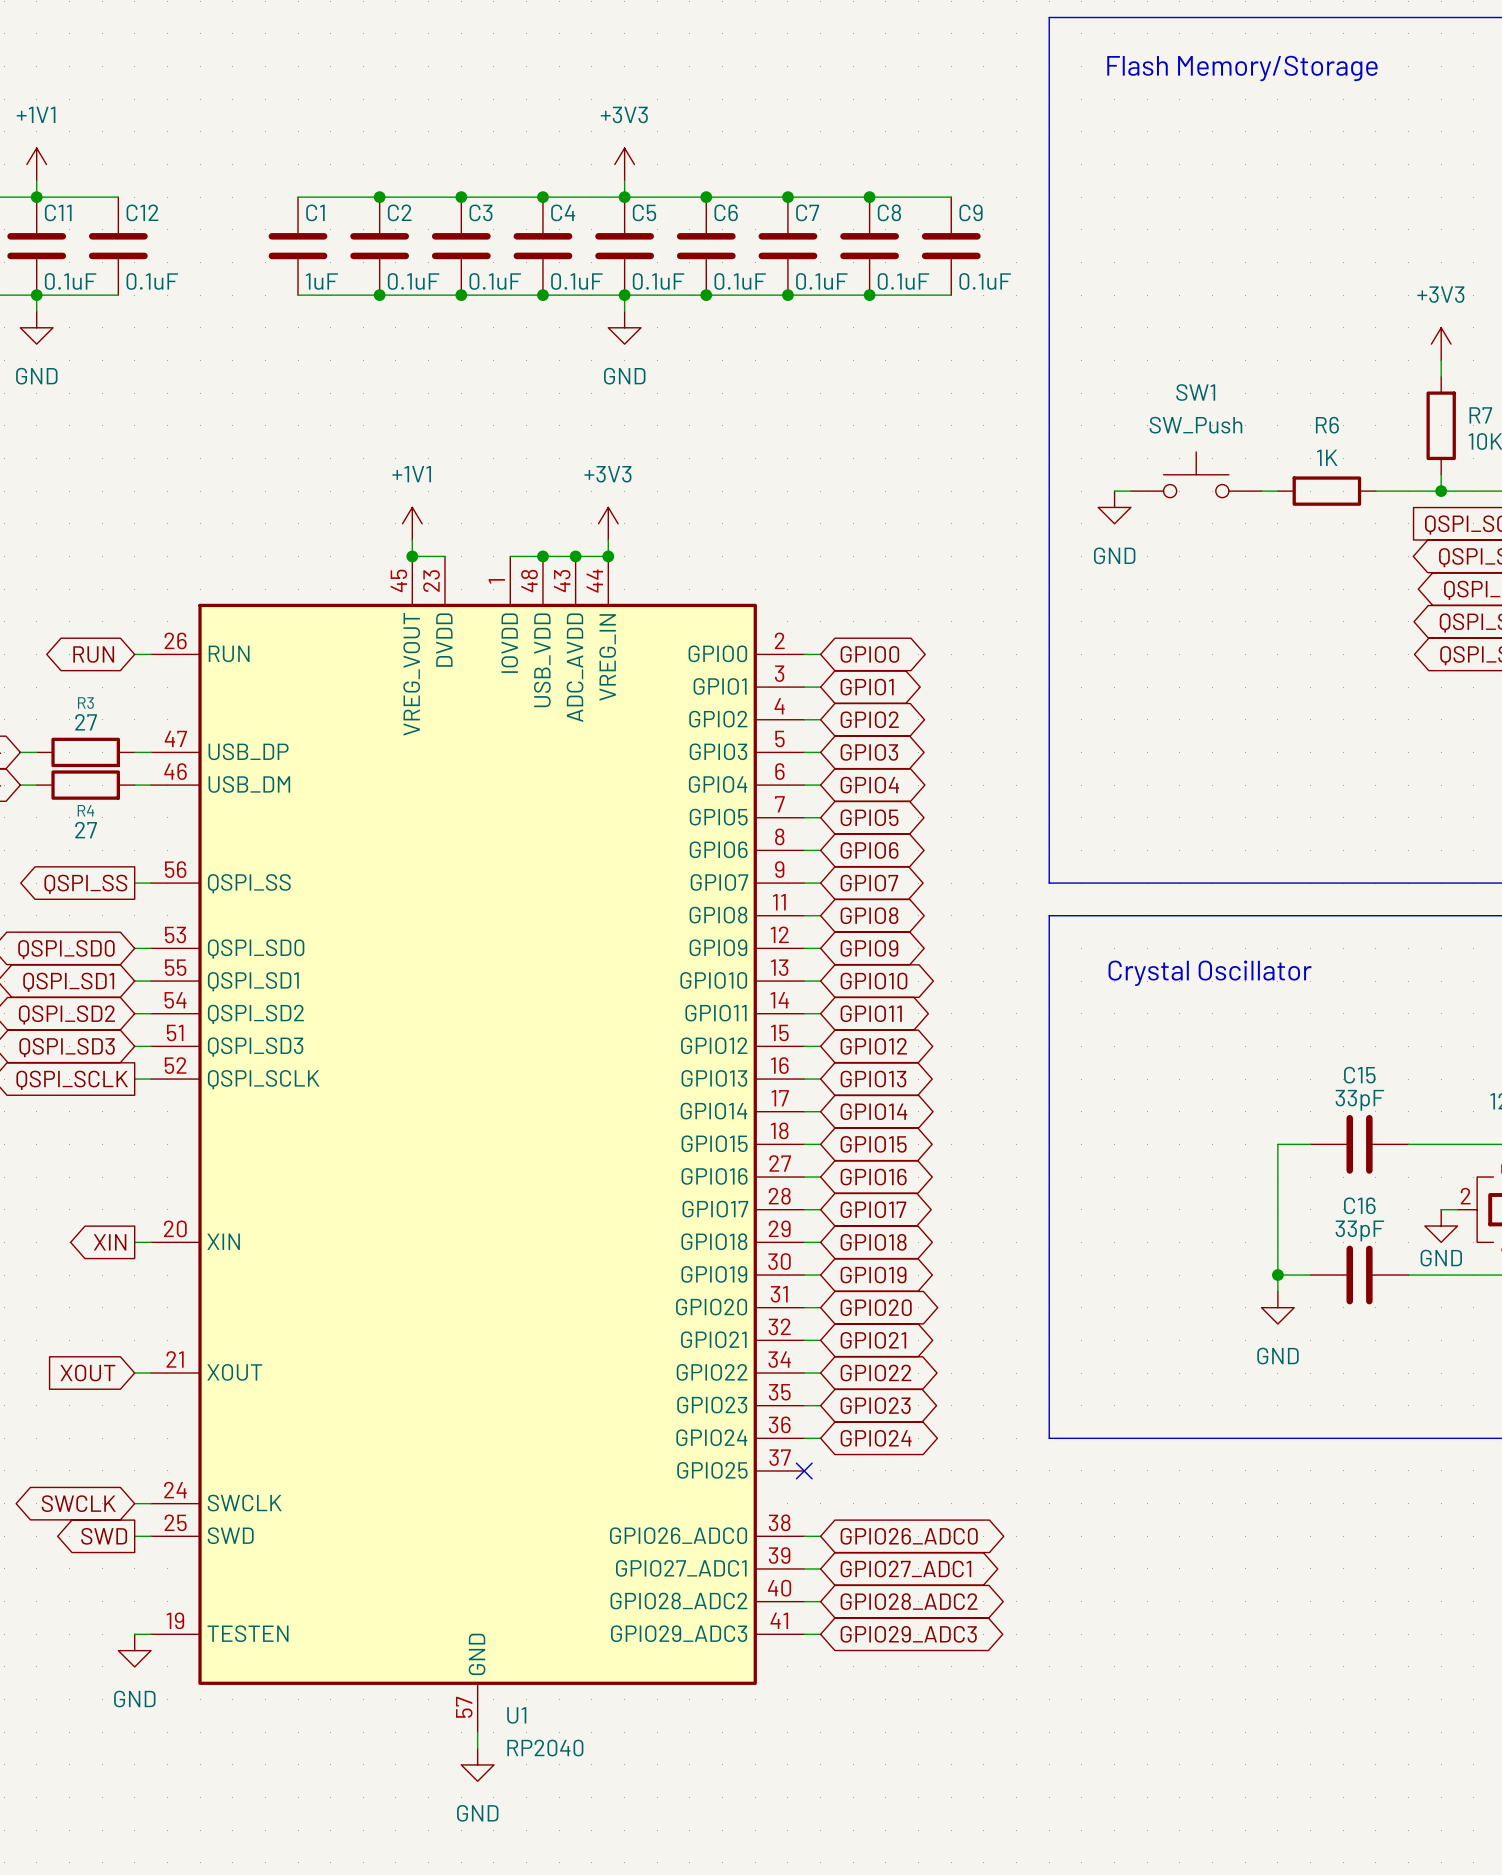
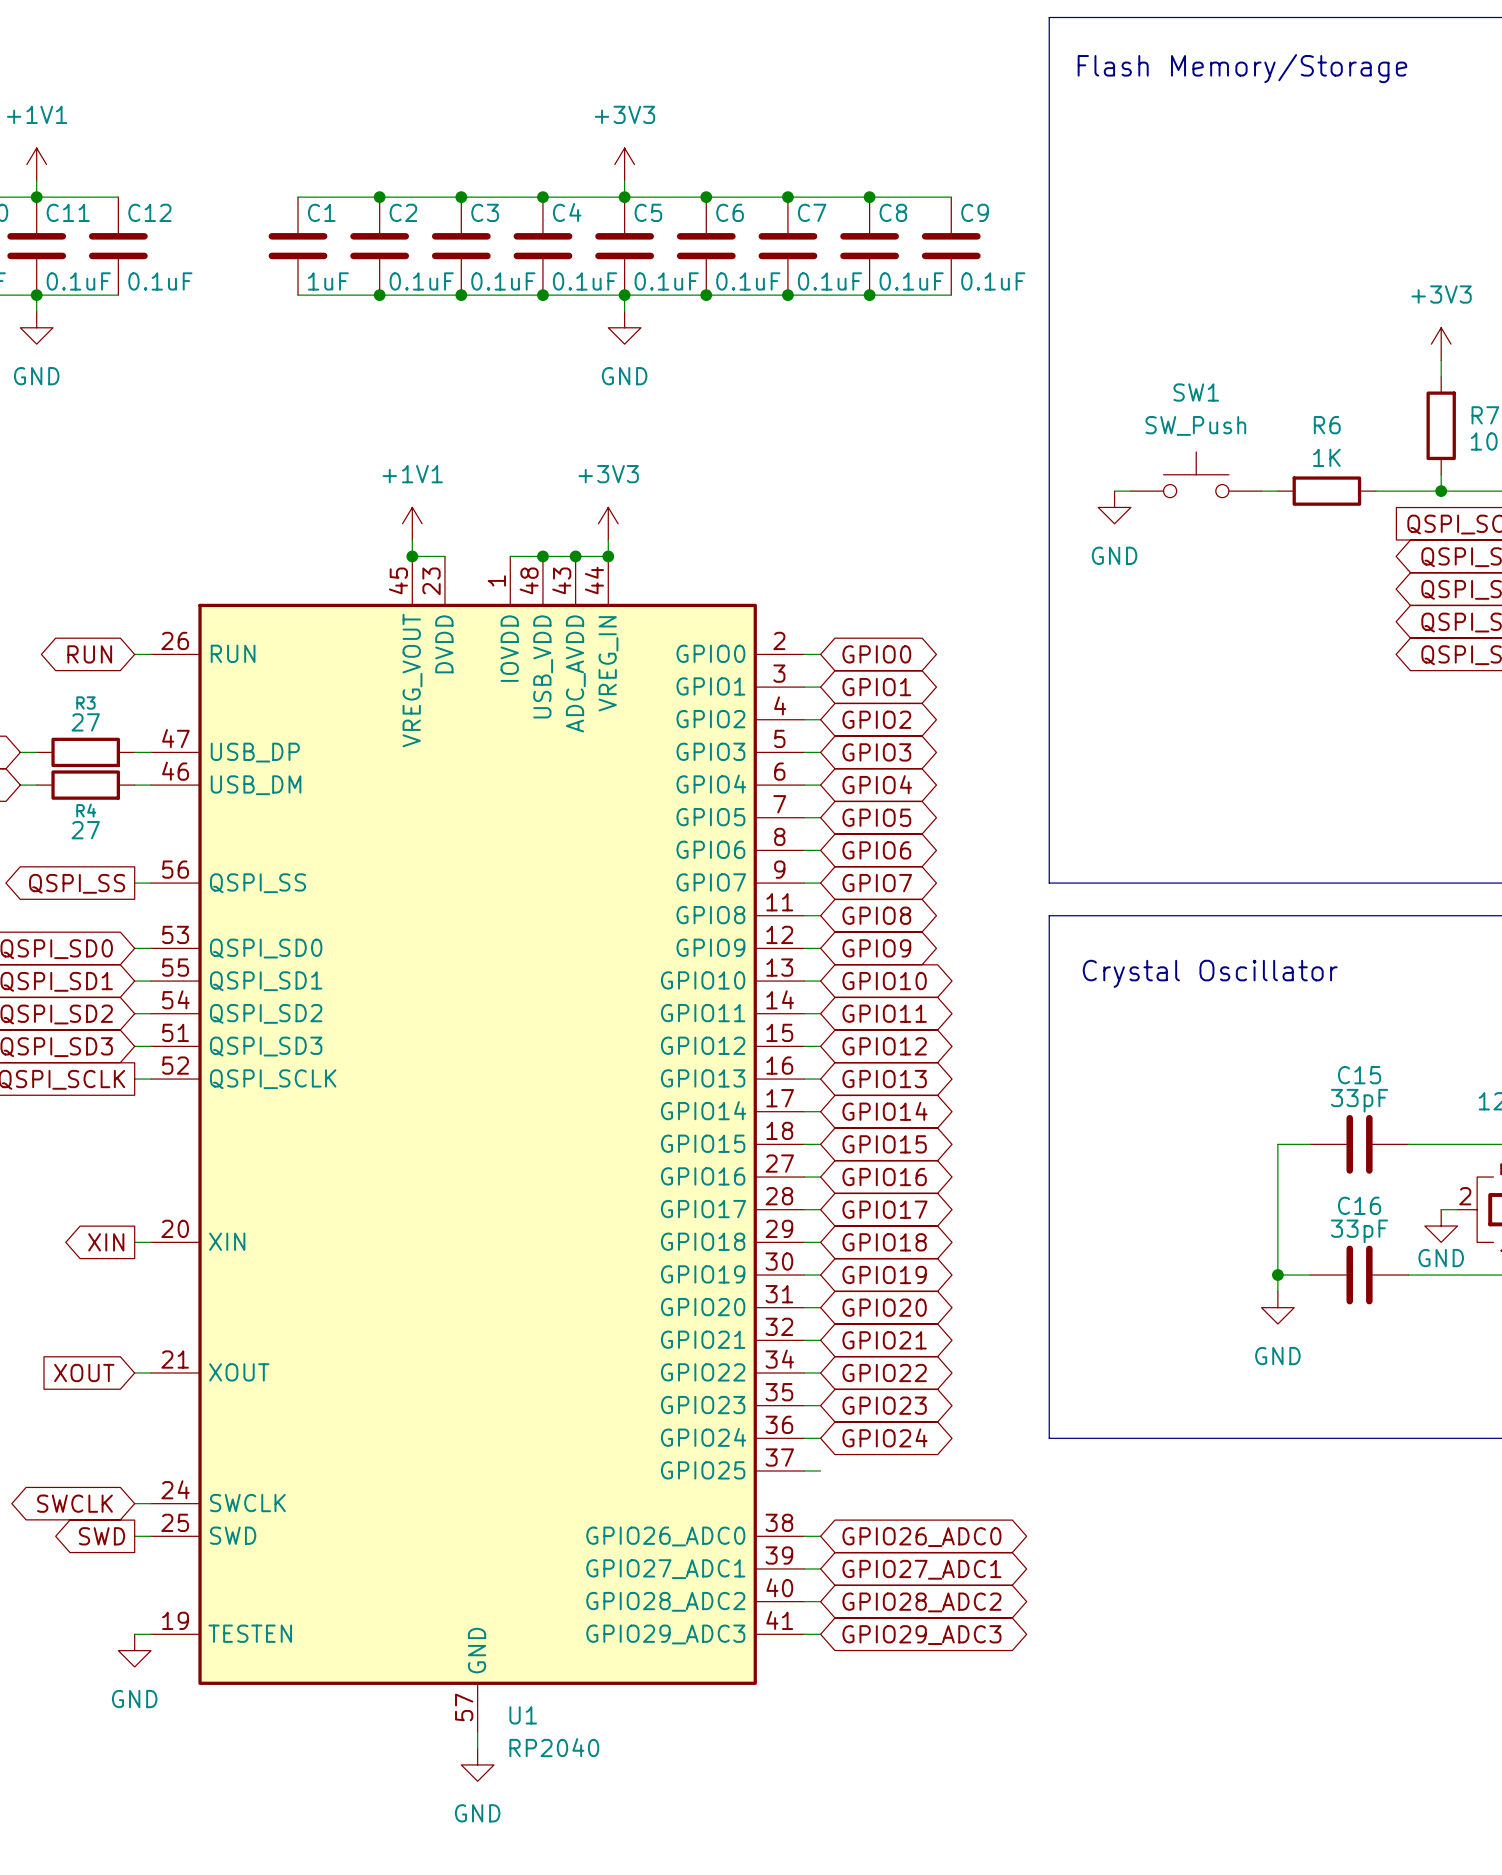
wire: none -> (804, 1470) (820, 1470)
no-connect mark: (804, 1470) -> none

